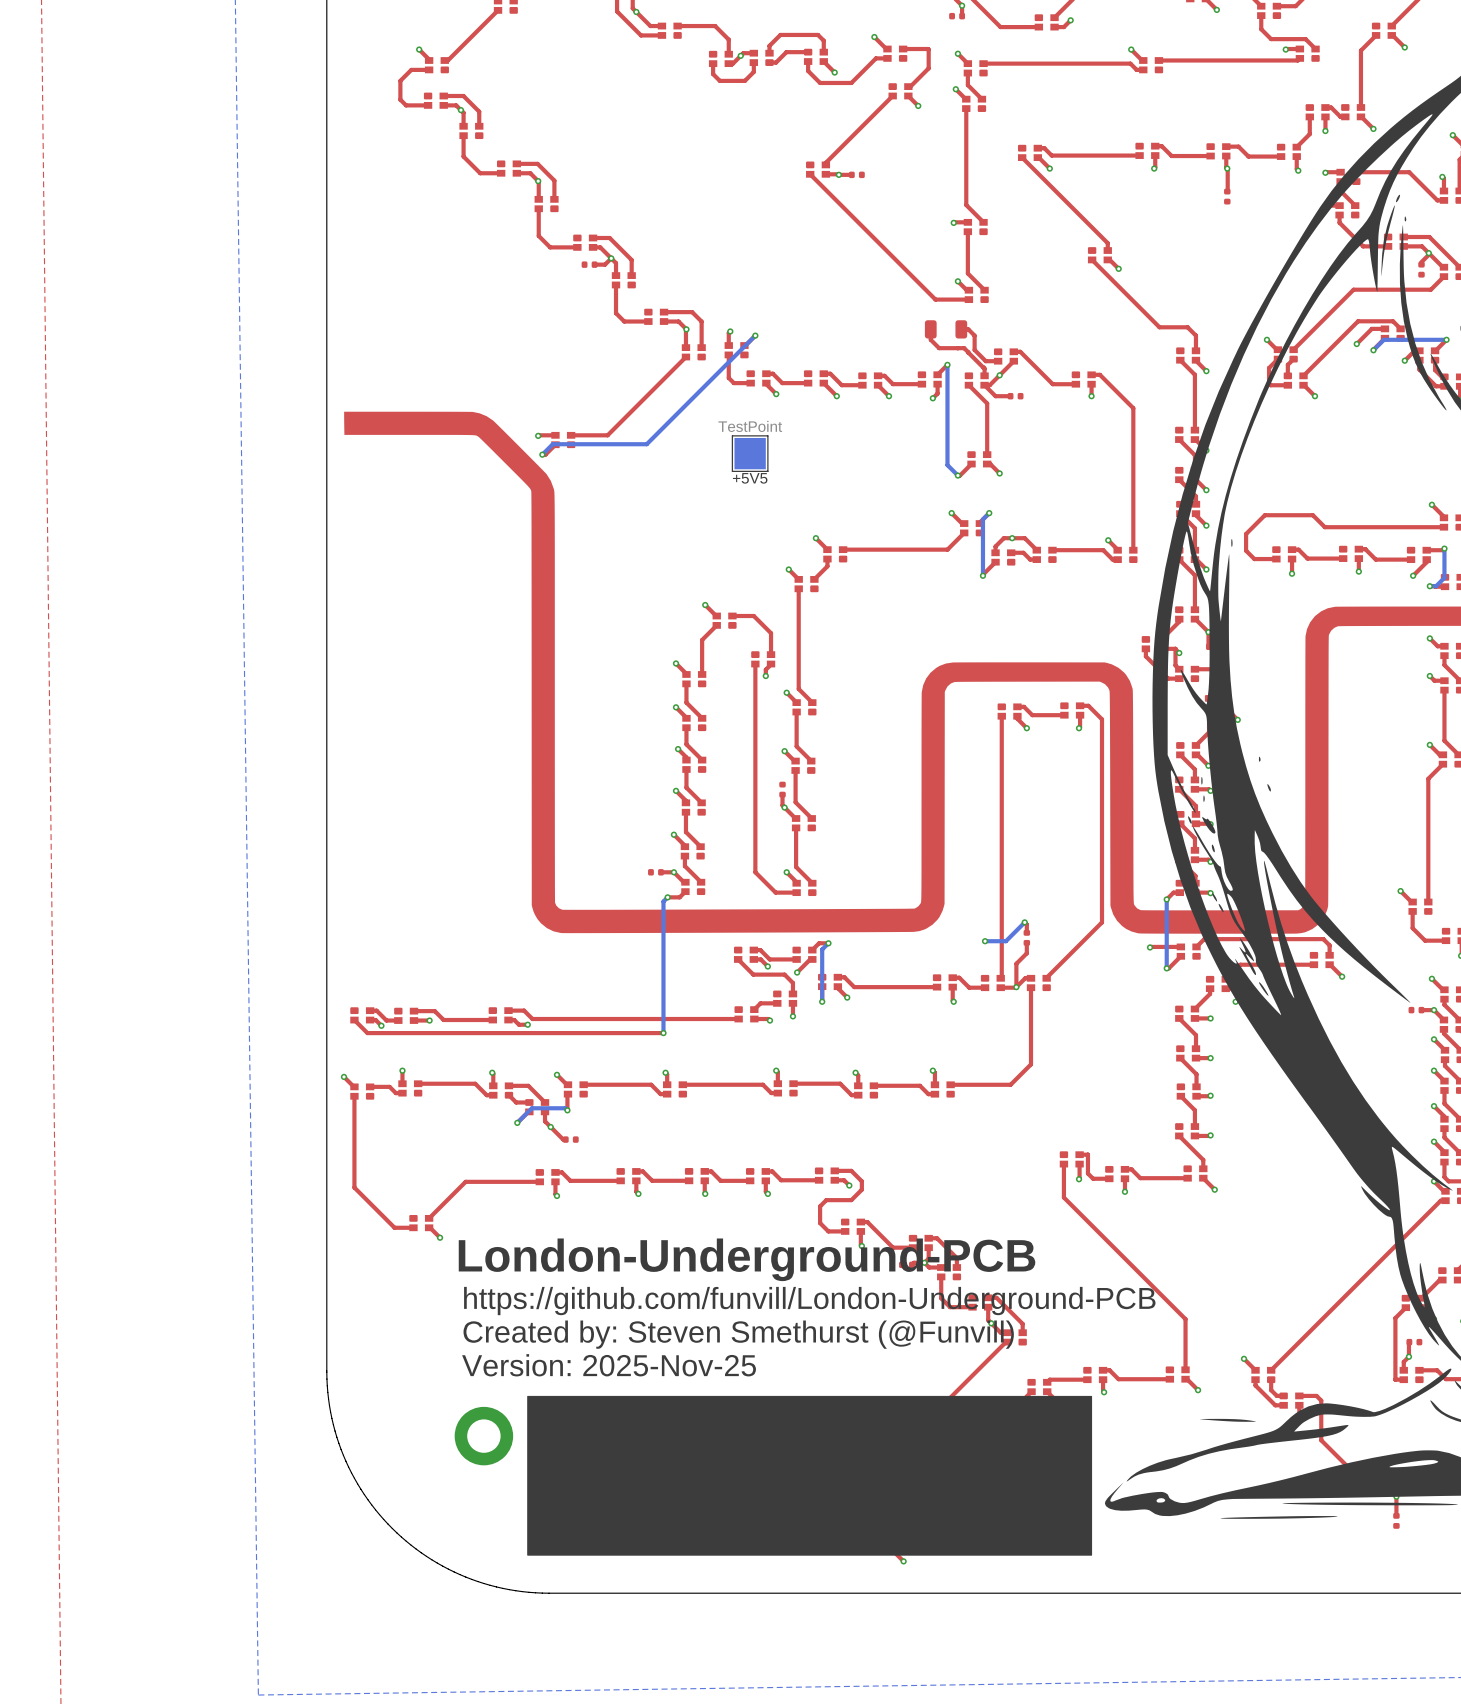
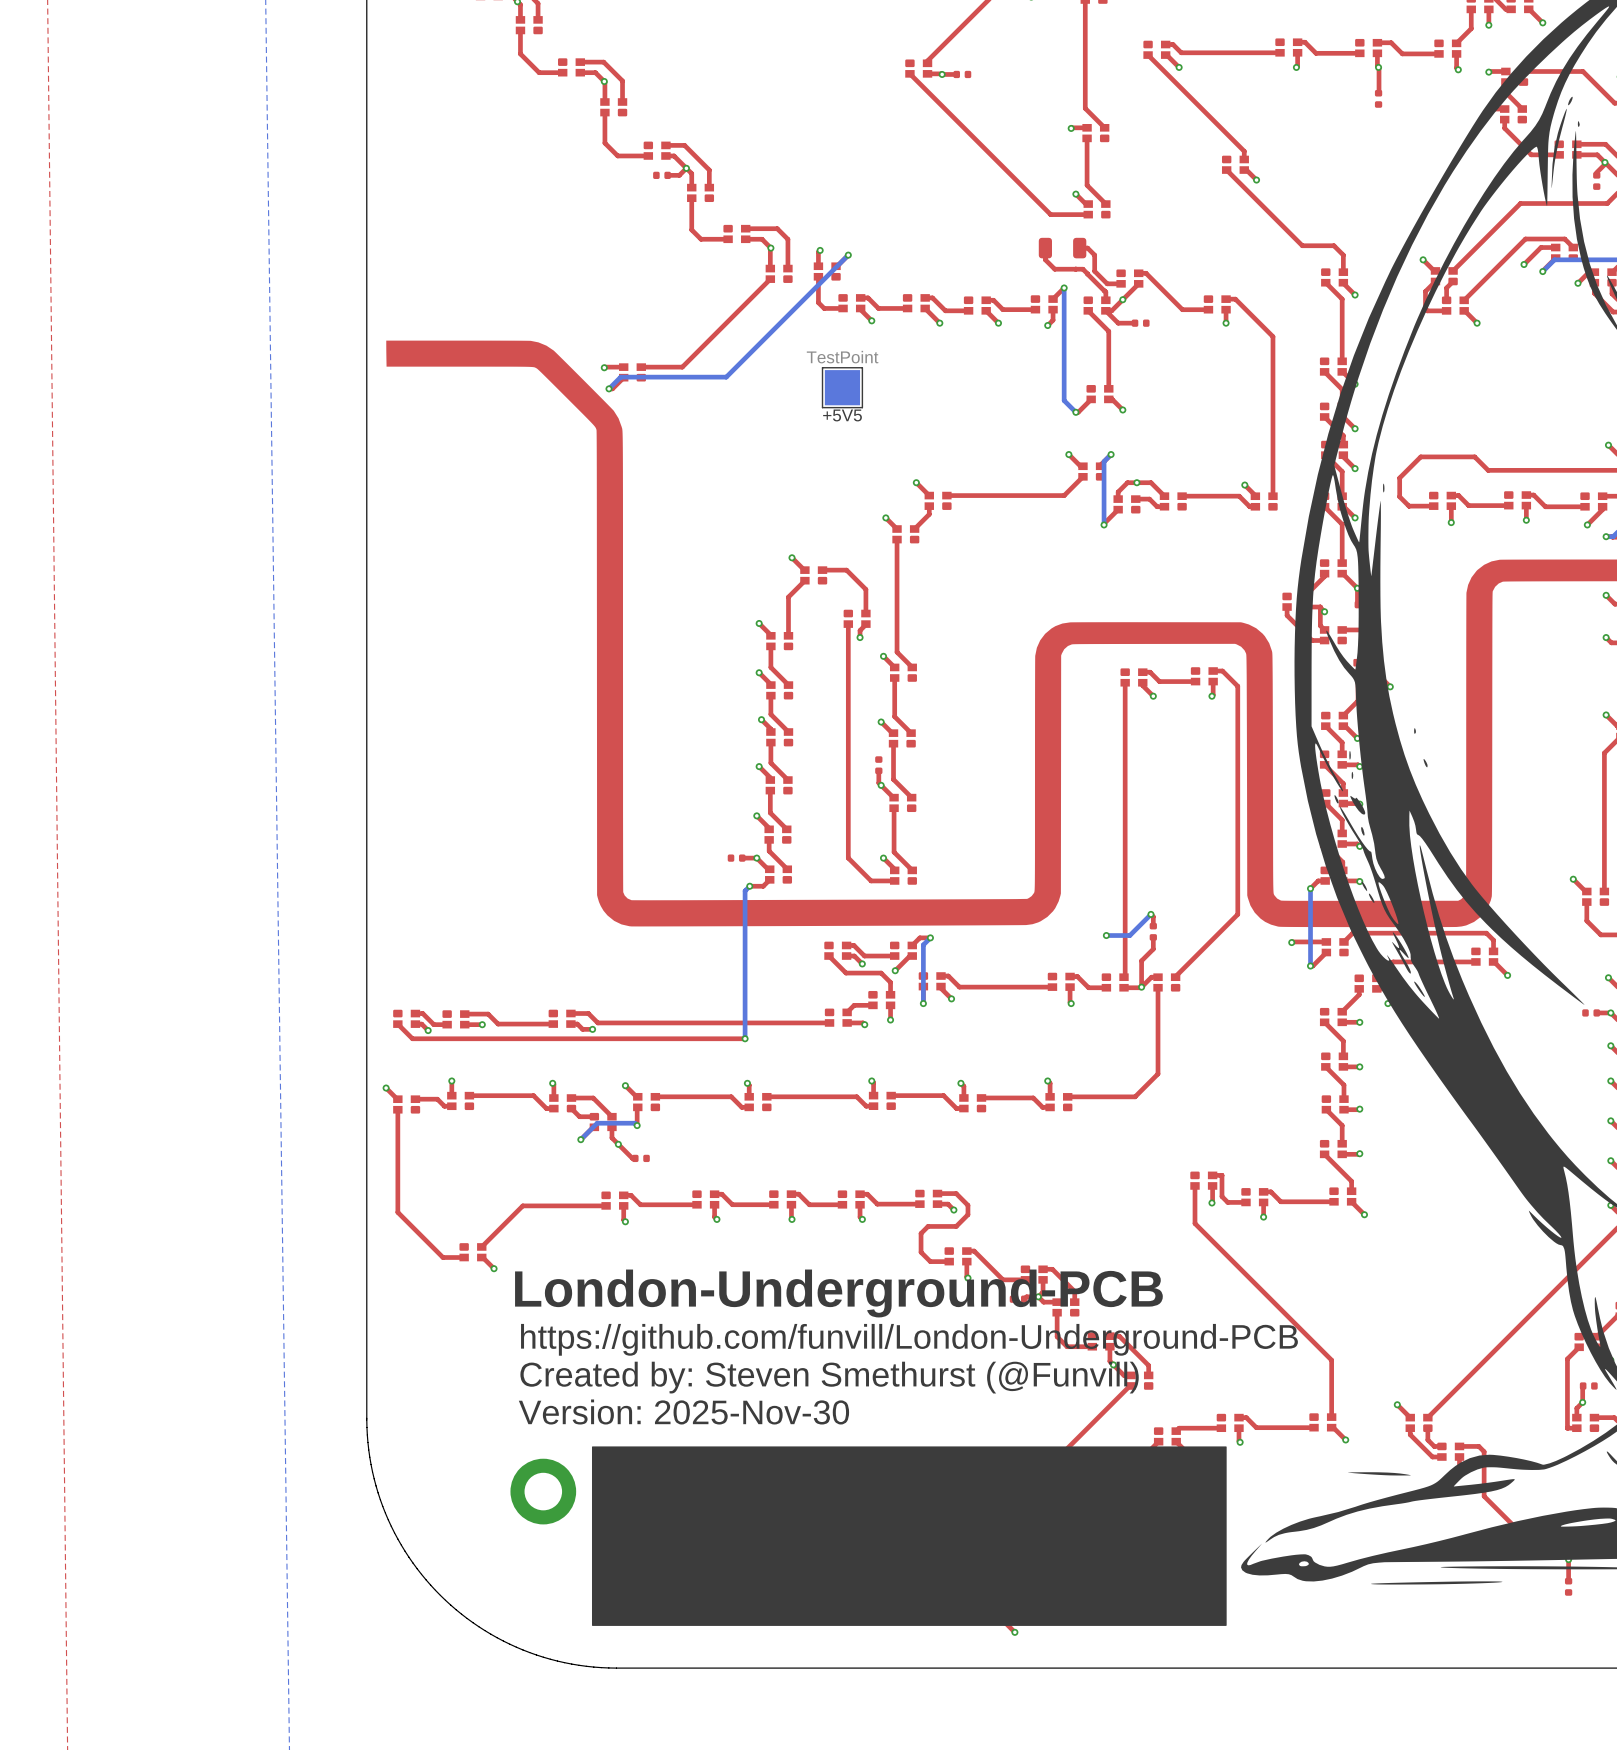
text: Version: 2025-Nov-25 (609, 1365) -> Version: 2025-Nov-30 (683, 1411)

